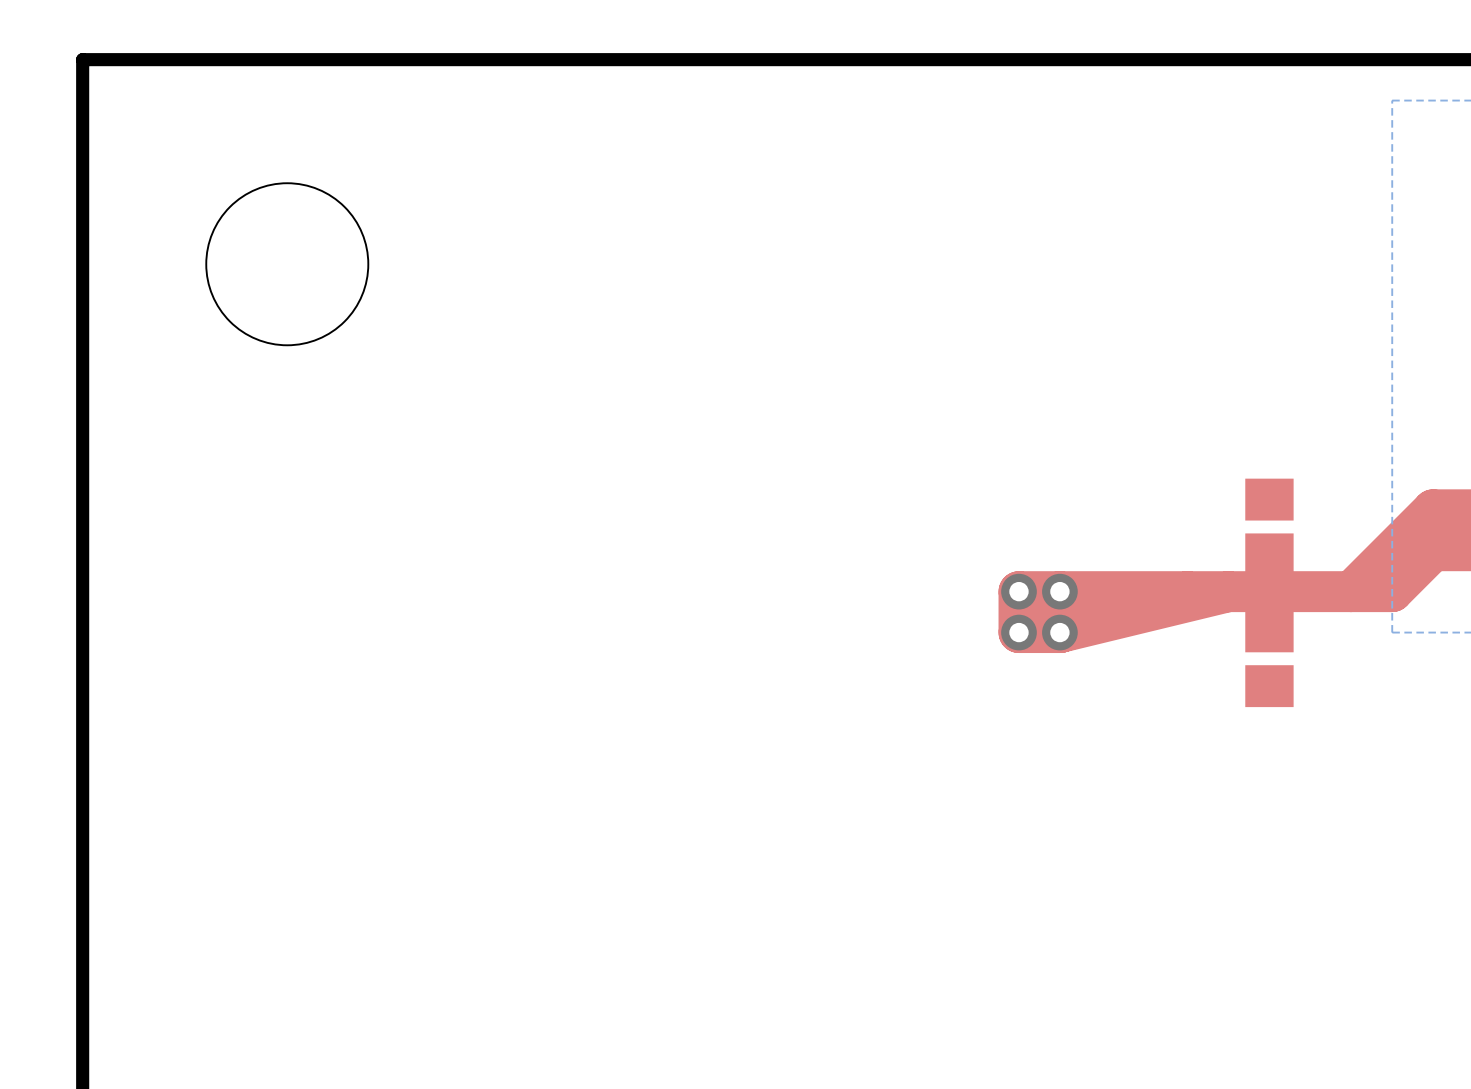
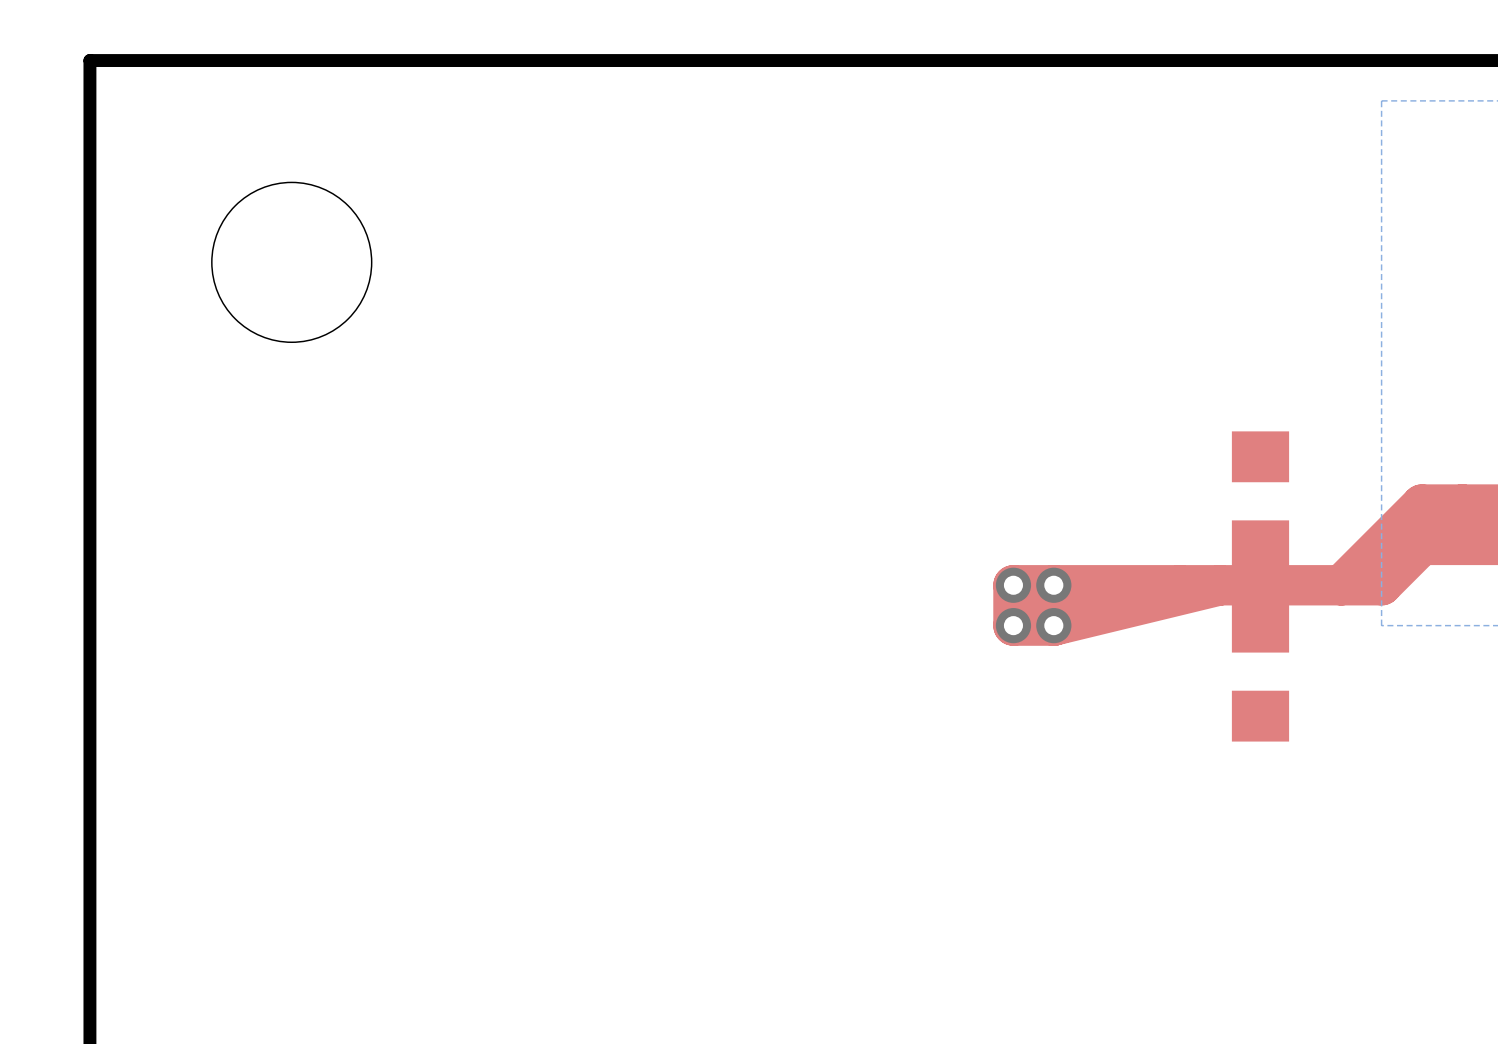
part footprint: [1245, 478, 1294, 576] -> [1231, 431, 1290, 572]
part footprint: [1245, 610, 1294, 708] -> [1231, 601, 1290, 742]

